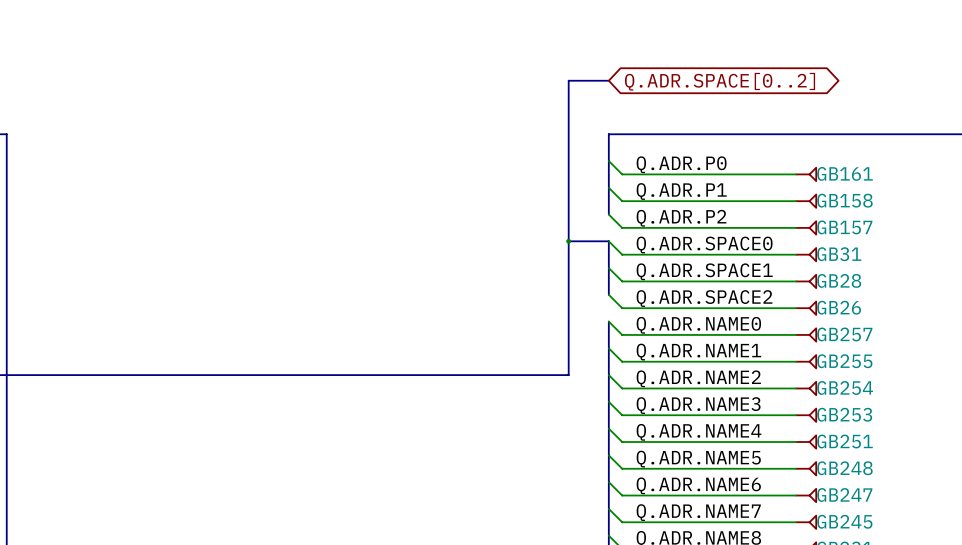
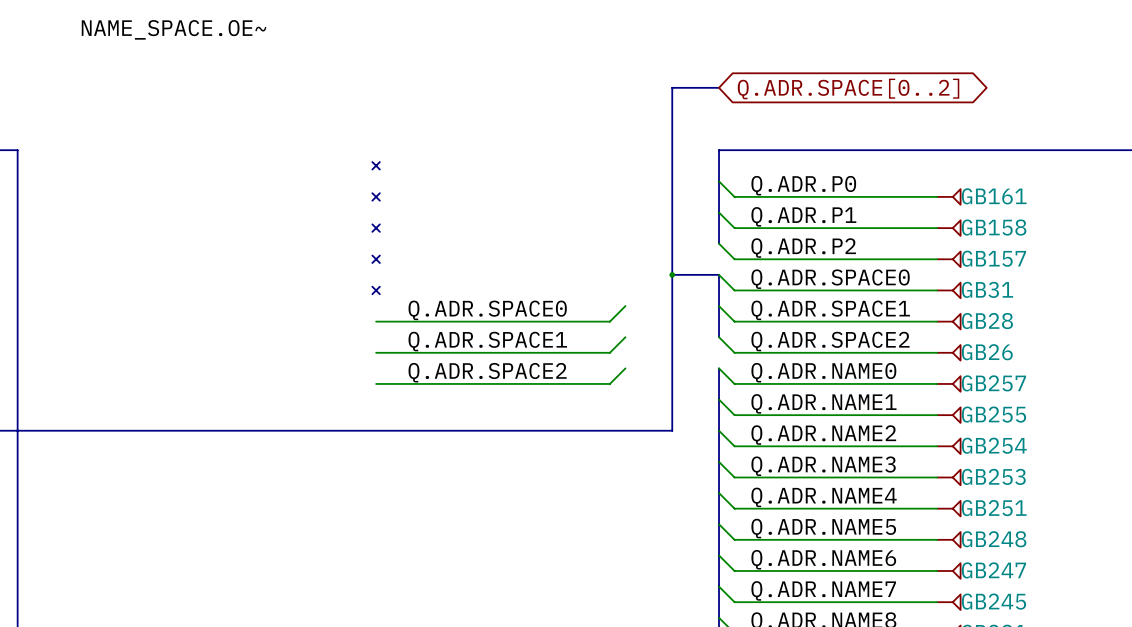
label: none -> NAME_SPACE.OE~ (174, 29)
no-connect mark: none -> (376, 165)
no-connect mark: none -> (376, 196)
no-connect mark: none -> (376, 228)
no-connect mark: none -> (376, 259)
no-connect mark: none -> (376, 290)
wire: none -> (625, 306) (609, 321) (376, 321)
label: none -> Q.ADR.SPACE0 (487, 310)
wire: none -> (625, 337) (609, 352) (376, 352)
label: none -> Q.ADR.SPACE1 (487, 341)
wire: none -> (625, 368) (609, 383) (376, 383)
label: none -> Q.ADR.SPACE2 (487, 372)

